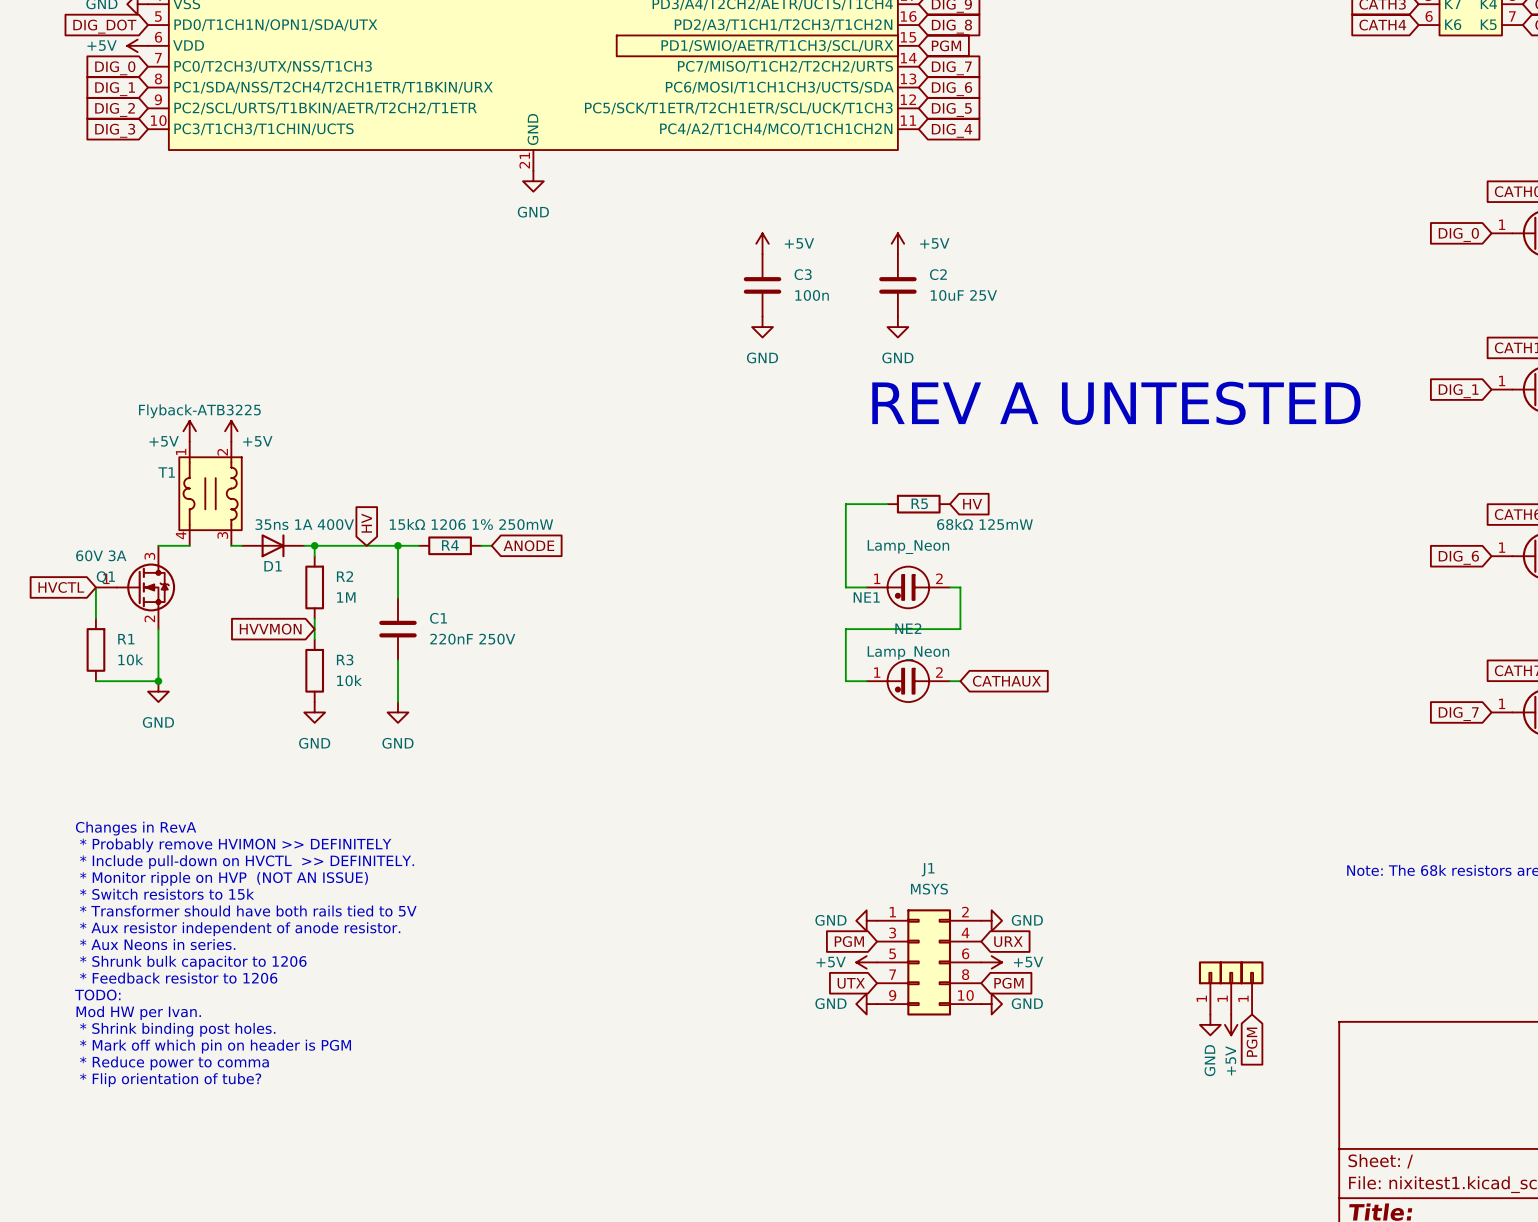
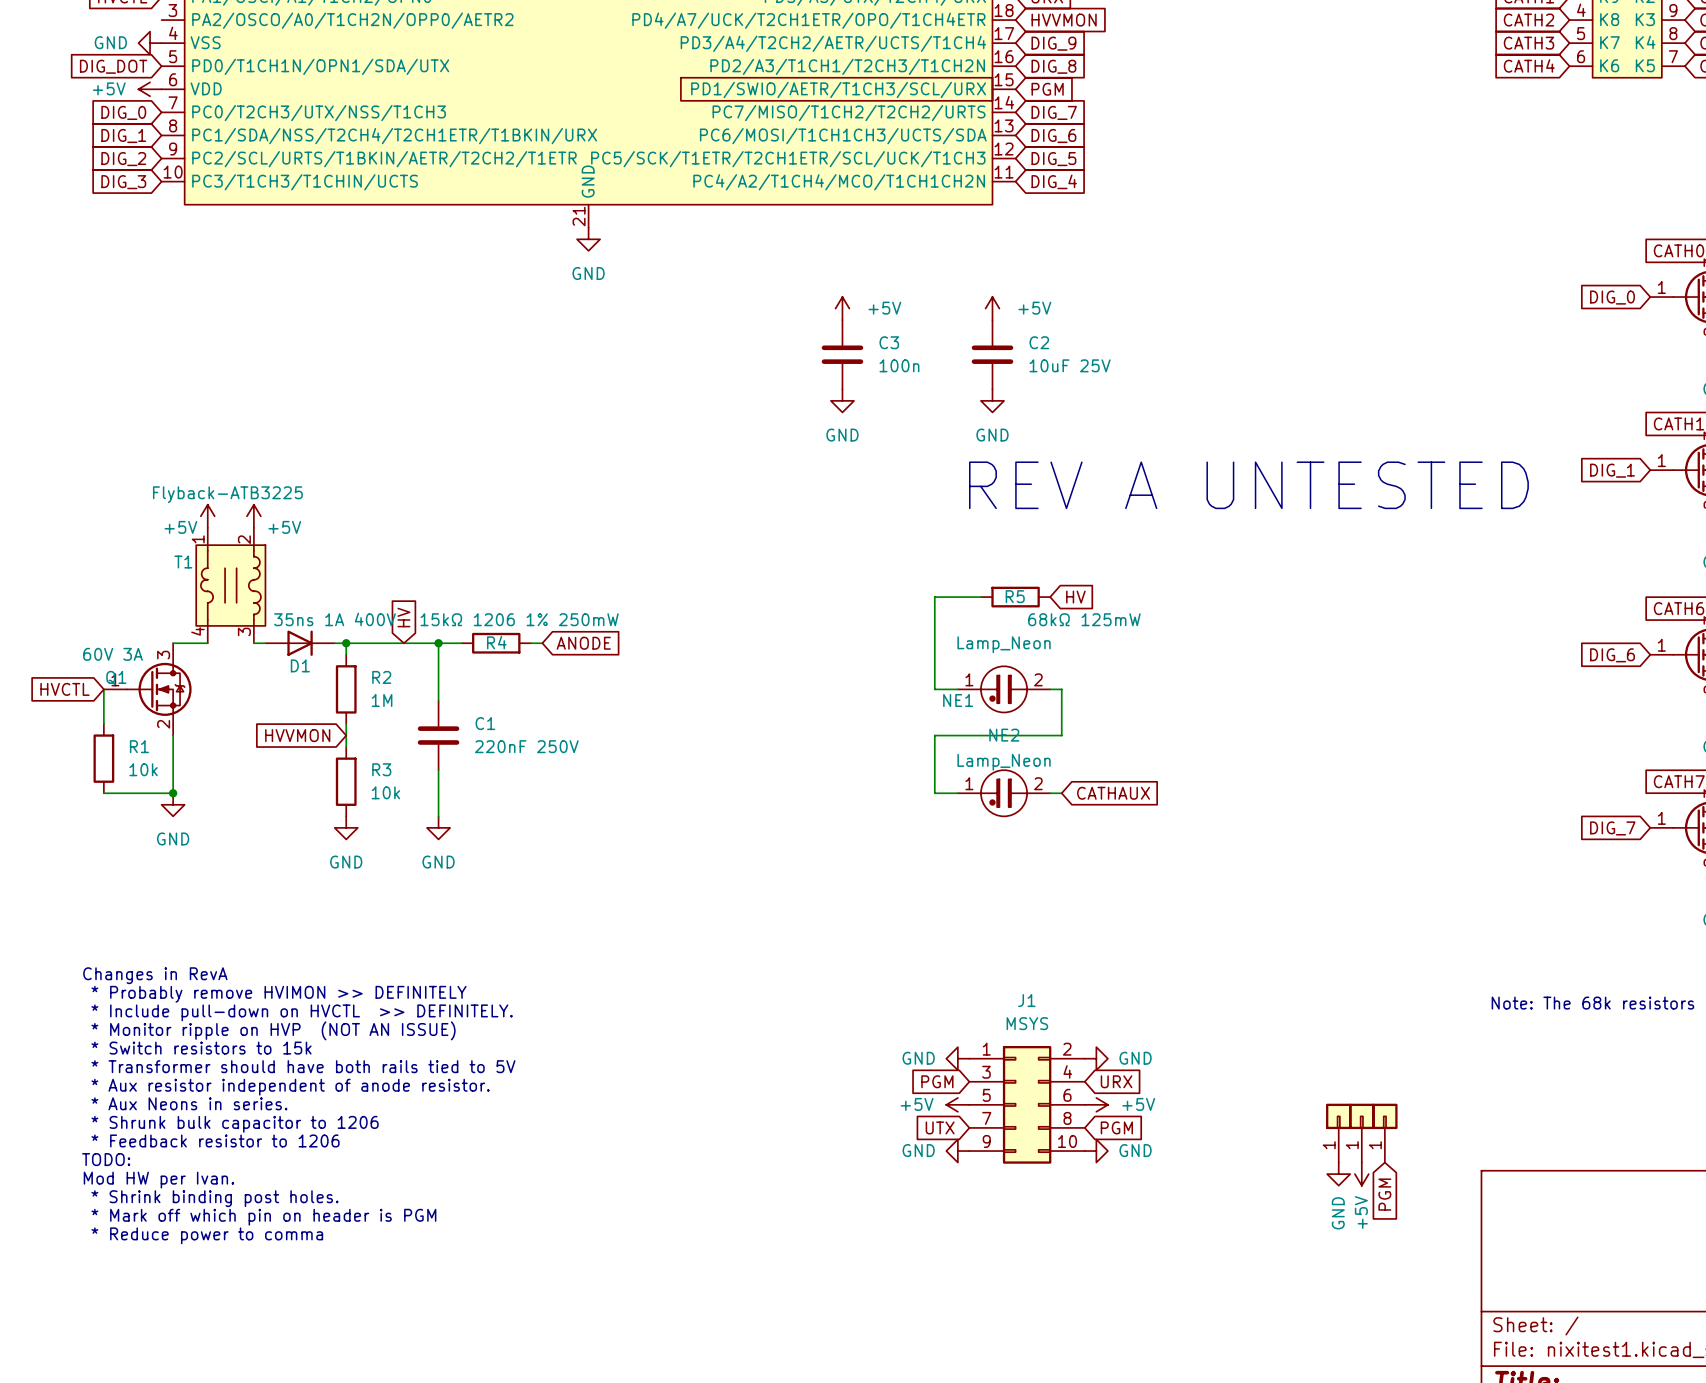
text: Changes in RevA (136, 828) -> none
text: * Probably remove HVIMON >> DEFINITELY (235, 845) -> Changes in RevA (155, 975)
text: * Include pull-down on HVCTL >> DEFINITELY. (247, 862) -> * Probably remove HVIMON >> DEFINITELY (279, 994)
text: * Monitor ripple on HVP (NOT AN ISSUE) (224, 878) -> * Include pull-down on HVCTL >> DEFINITELY. (302, 1012)
text: * Switch resistors to 15k (167, 894) -> * Monitor ripple on HVP (NOT AN ISSUE) (273, 1030)
text: * Transformer should have both rails tied to 5V (248, 911) -> * Switch resistors to 15k (201, 1048)
text: * Aux resistor independent of anode resistor. (240, 929) -> * Transformer should have both rails tied to 5V (303, 1066)
text: * Aux Neons in series. (157, 944) -> * Aux resistor independent of anode resistor. (290, 1087)
text: * Shrunk bulk capacitor to 1206 (193, 962) -> * Aux Neons in series. (189, 1103)
text: * Feedback resistor to 1206 (178, 978) -> * Shrunk bulk capacitor to 1206 (235, 1124)
text: TODO: (97, 995) -> * Feedback resistor to 1206 (215, 1140)
text: Mod HW per Ivan. (138, 1013) -> TODO: (106, 1159)
text: * Shrink binding post holes. (177, 1029) -> Mod HW per Ivan. (158, 1180)
text: * Mark off which pin on header is PGM (215, 1046) -> * Shrink binding post holes. (214, 1198)
text: * Reduce power to comma (174, 1063) -> * Mark off which pin on header is PGM (263, 1217)
text: * Flip orientation of tube? (170, 1080) -> * Reduce power to comma (207, 1235)

